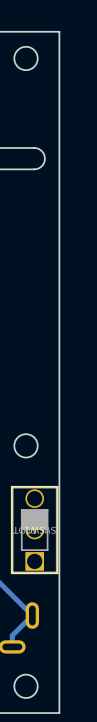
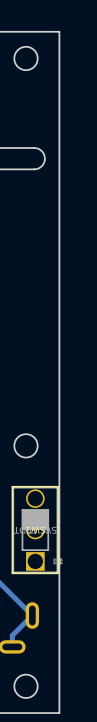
part footprint: [11, 486, 59, 574] -> [11, 486, 59, 574]

